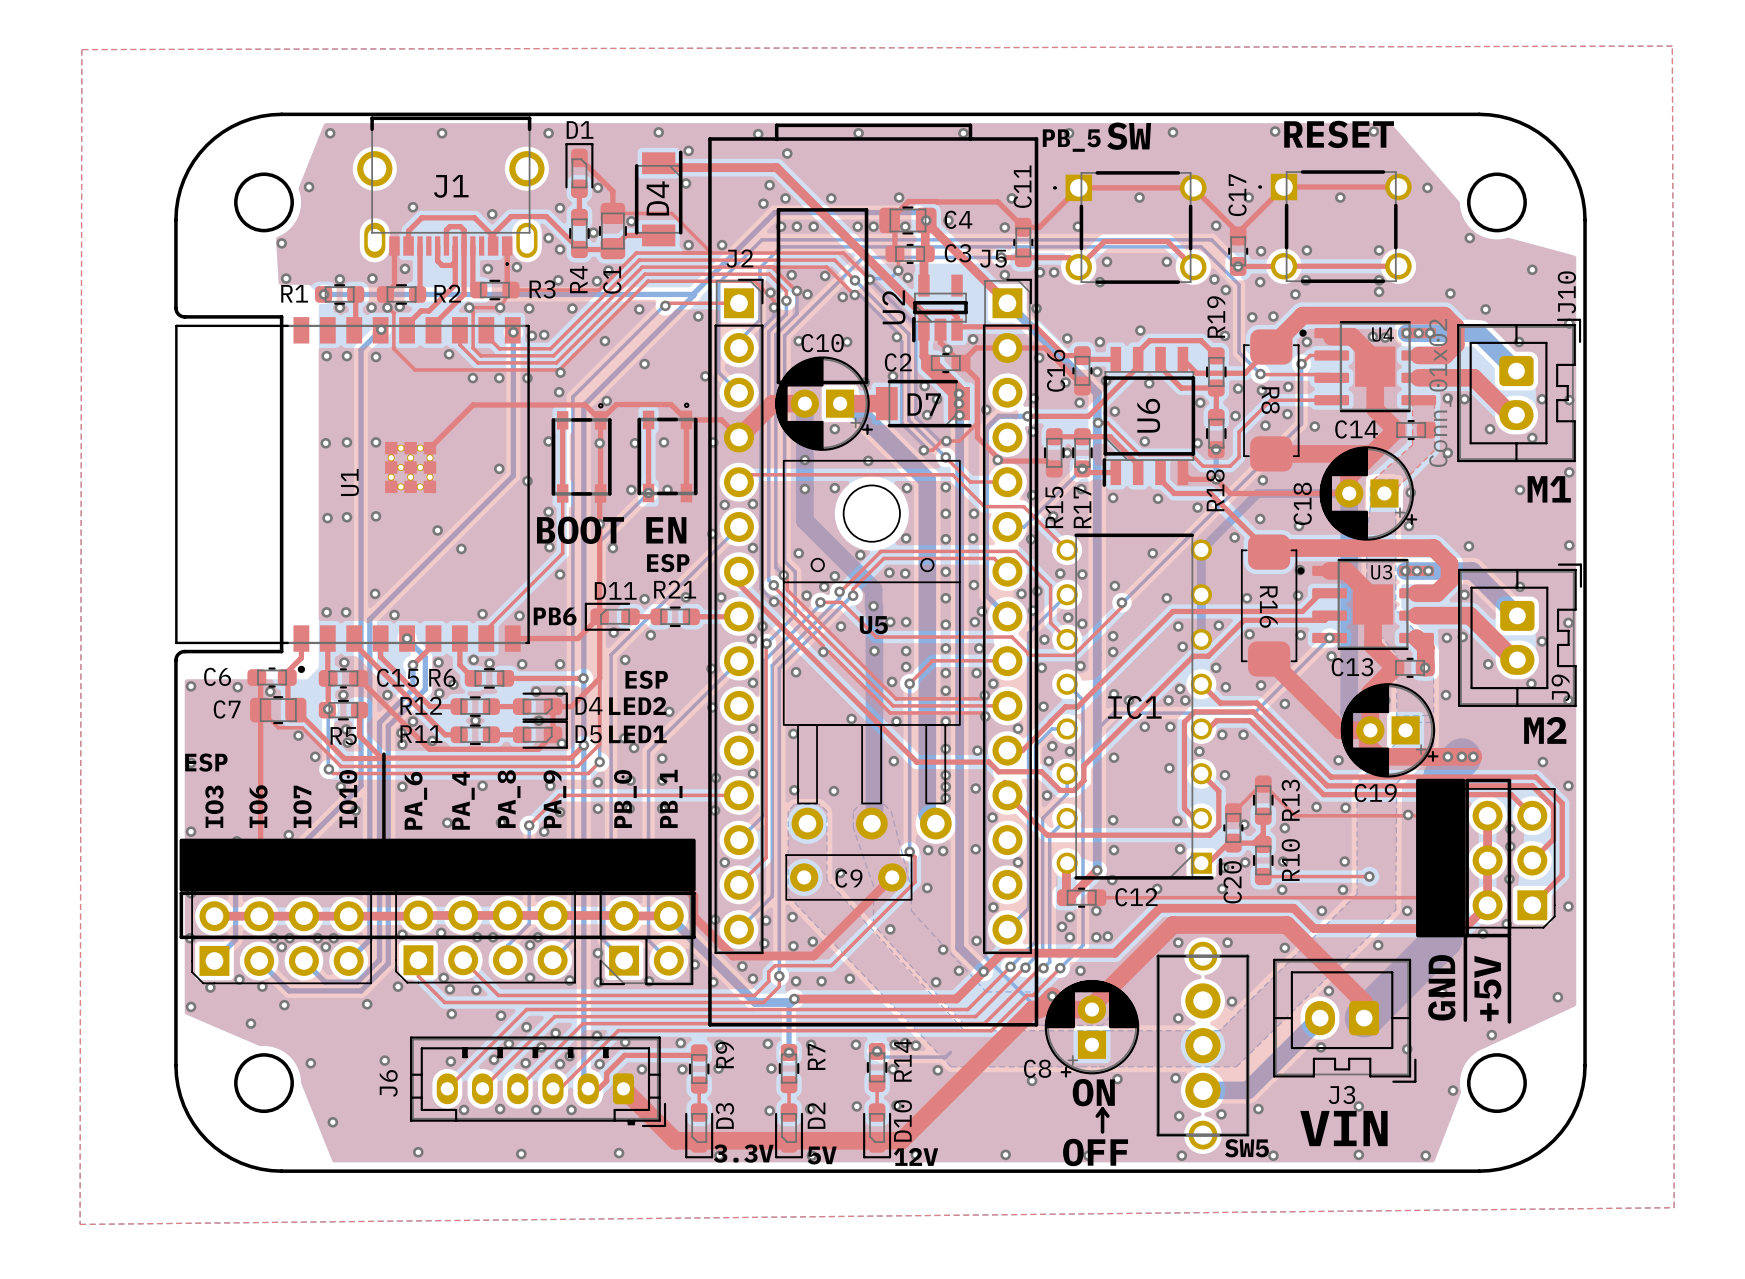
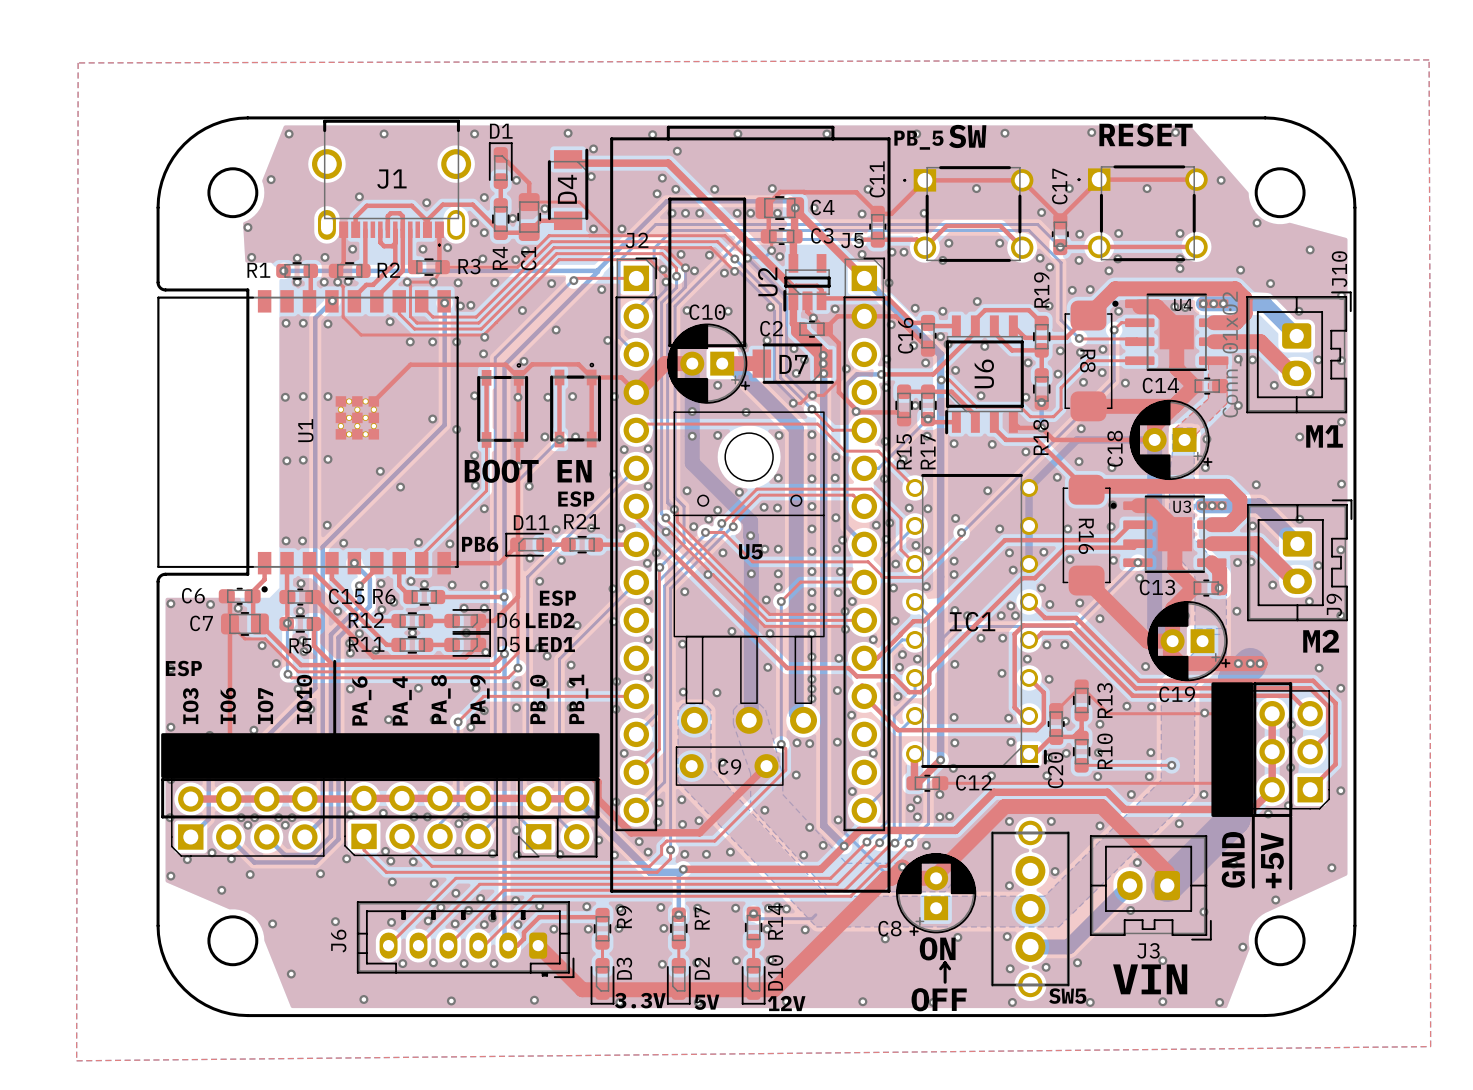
D4 name: D4 (588, 705) -> D6 (508, 620)

